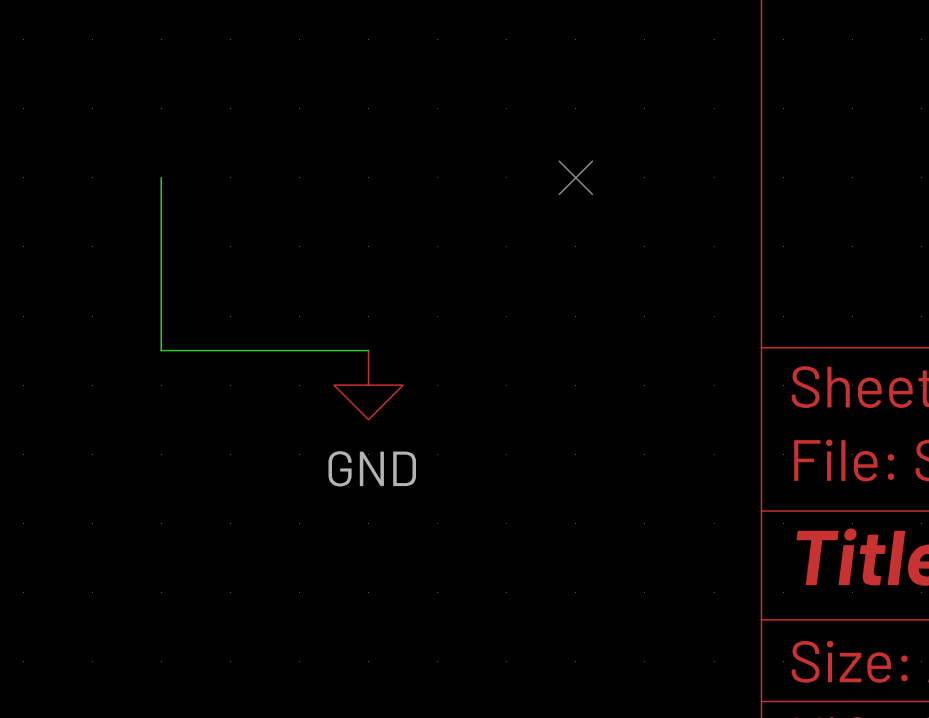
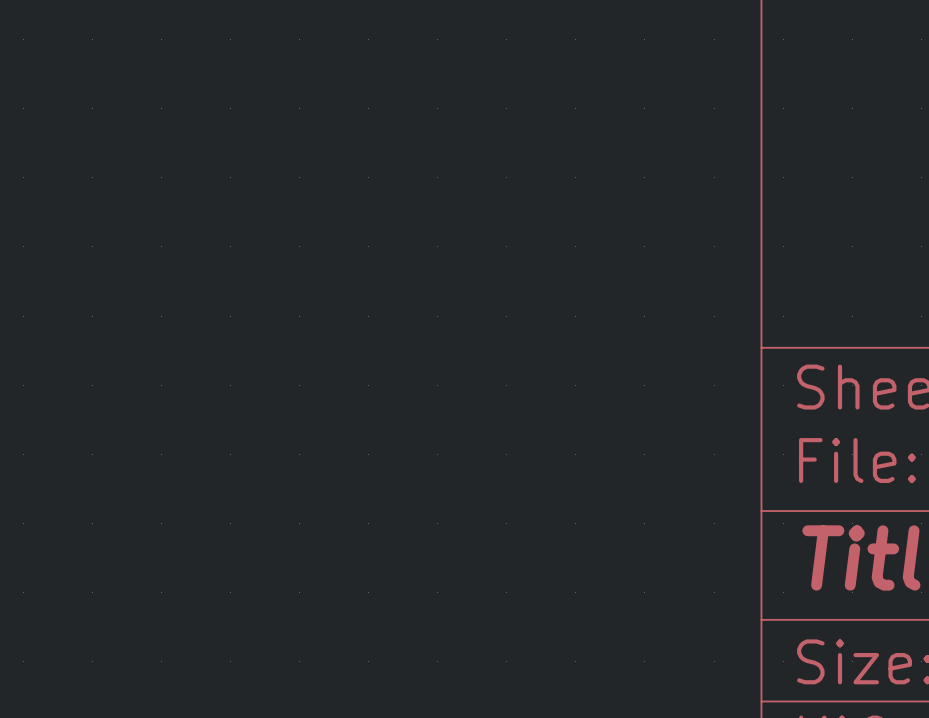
wire: (161, 177) (161, 350) (368, 350) -> none
no-connect mark: (575, 177) -> none
power symbol: GND (368, 385) -> none

